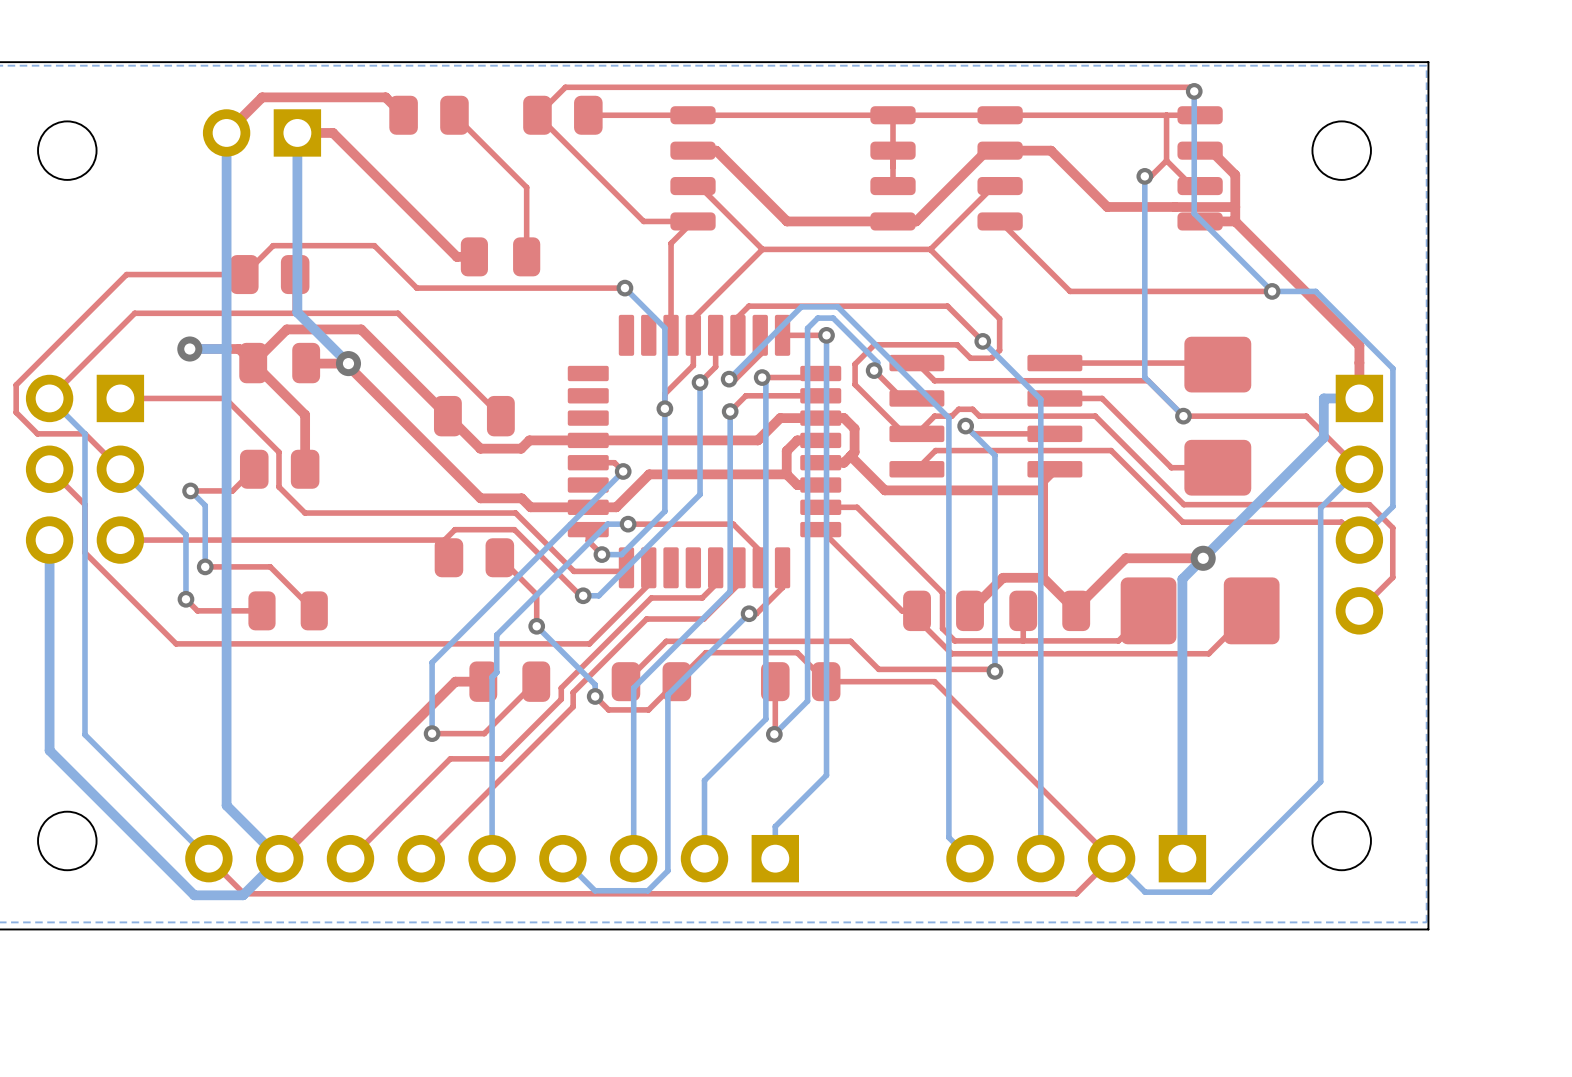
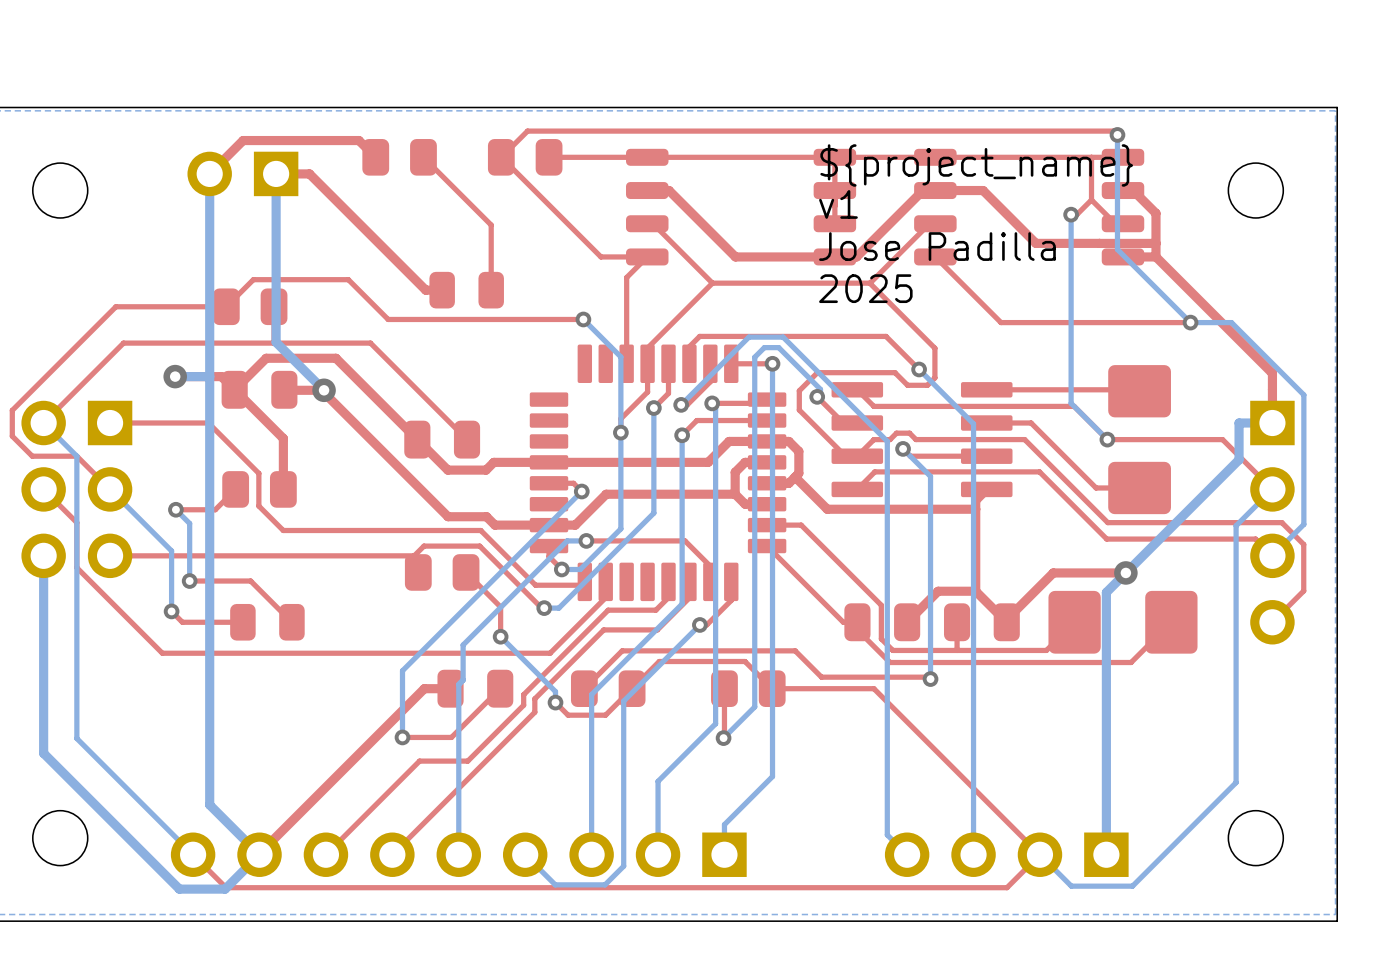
text: none -> ${project_name} (976, 165)
text: none -> v1 (838, 204)
text: none -> Jose Padilla (937, 246)
text: none -> 2025 (865, 288)

